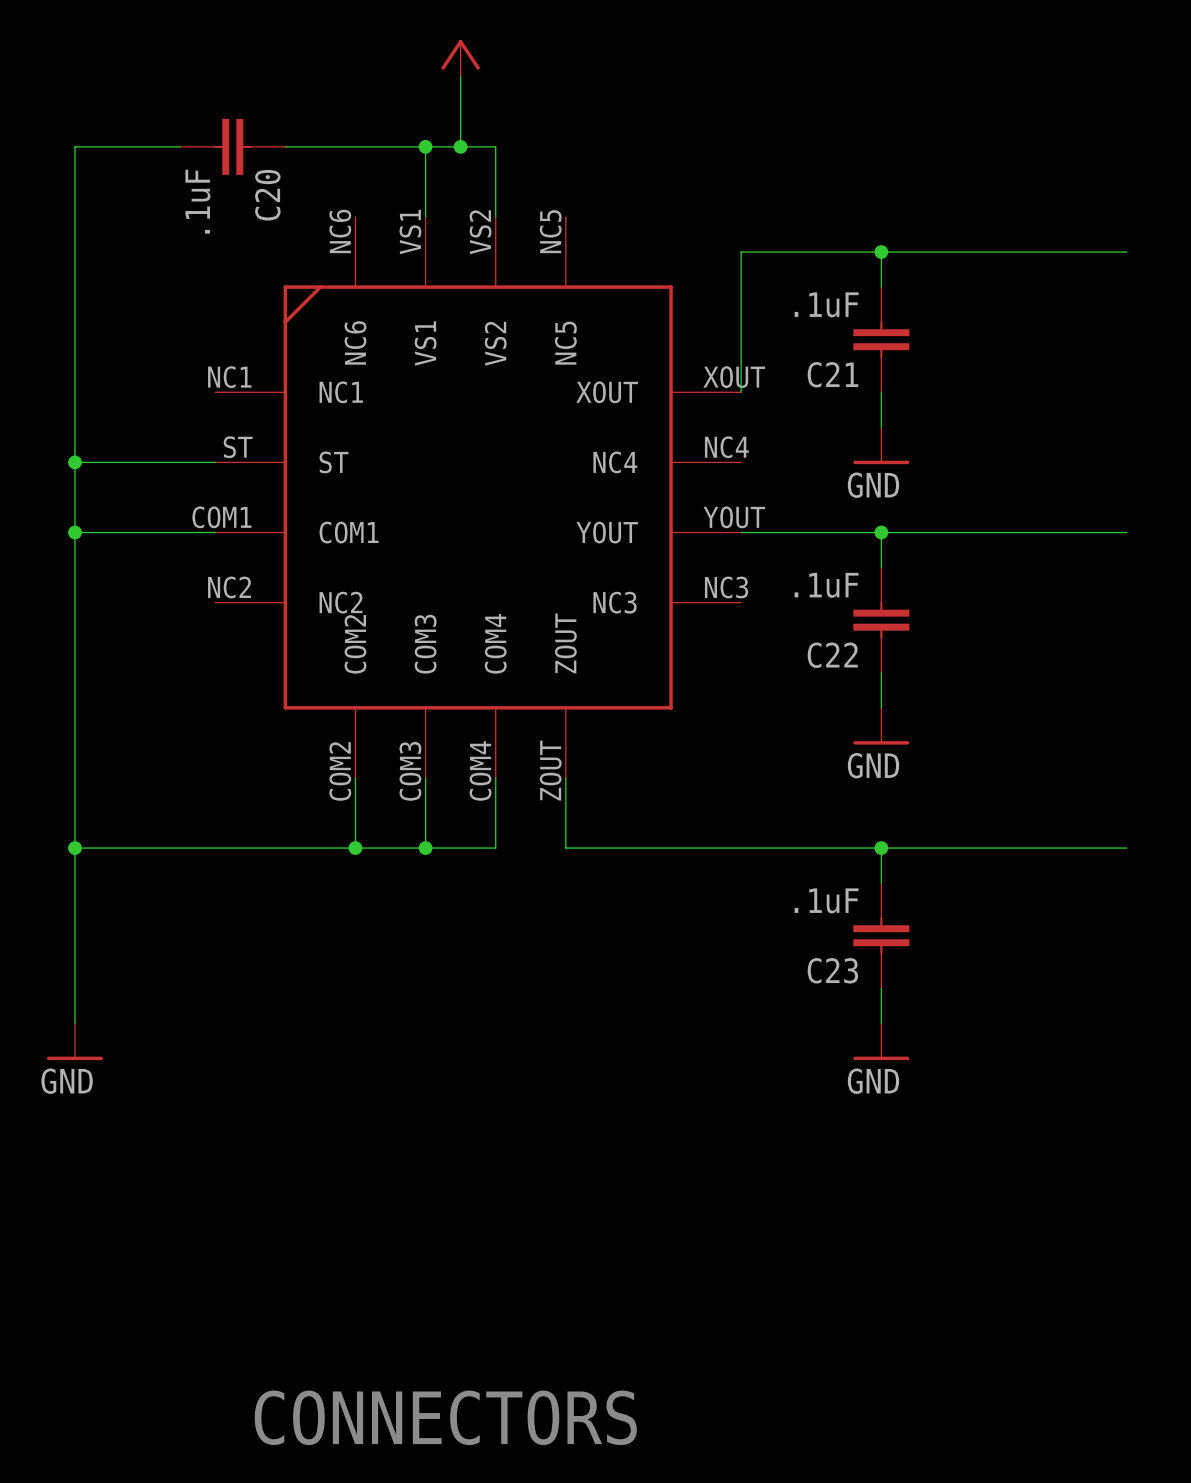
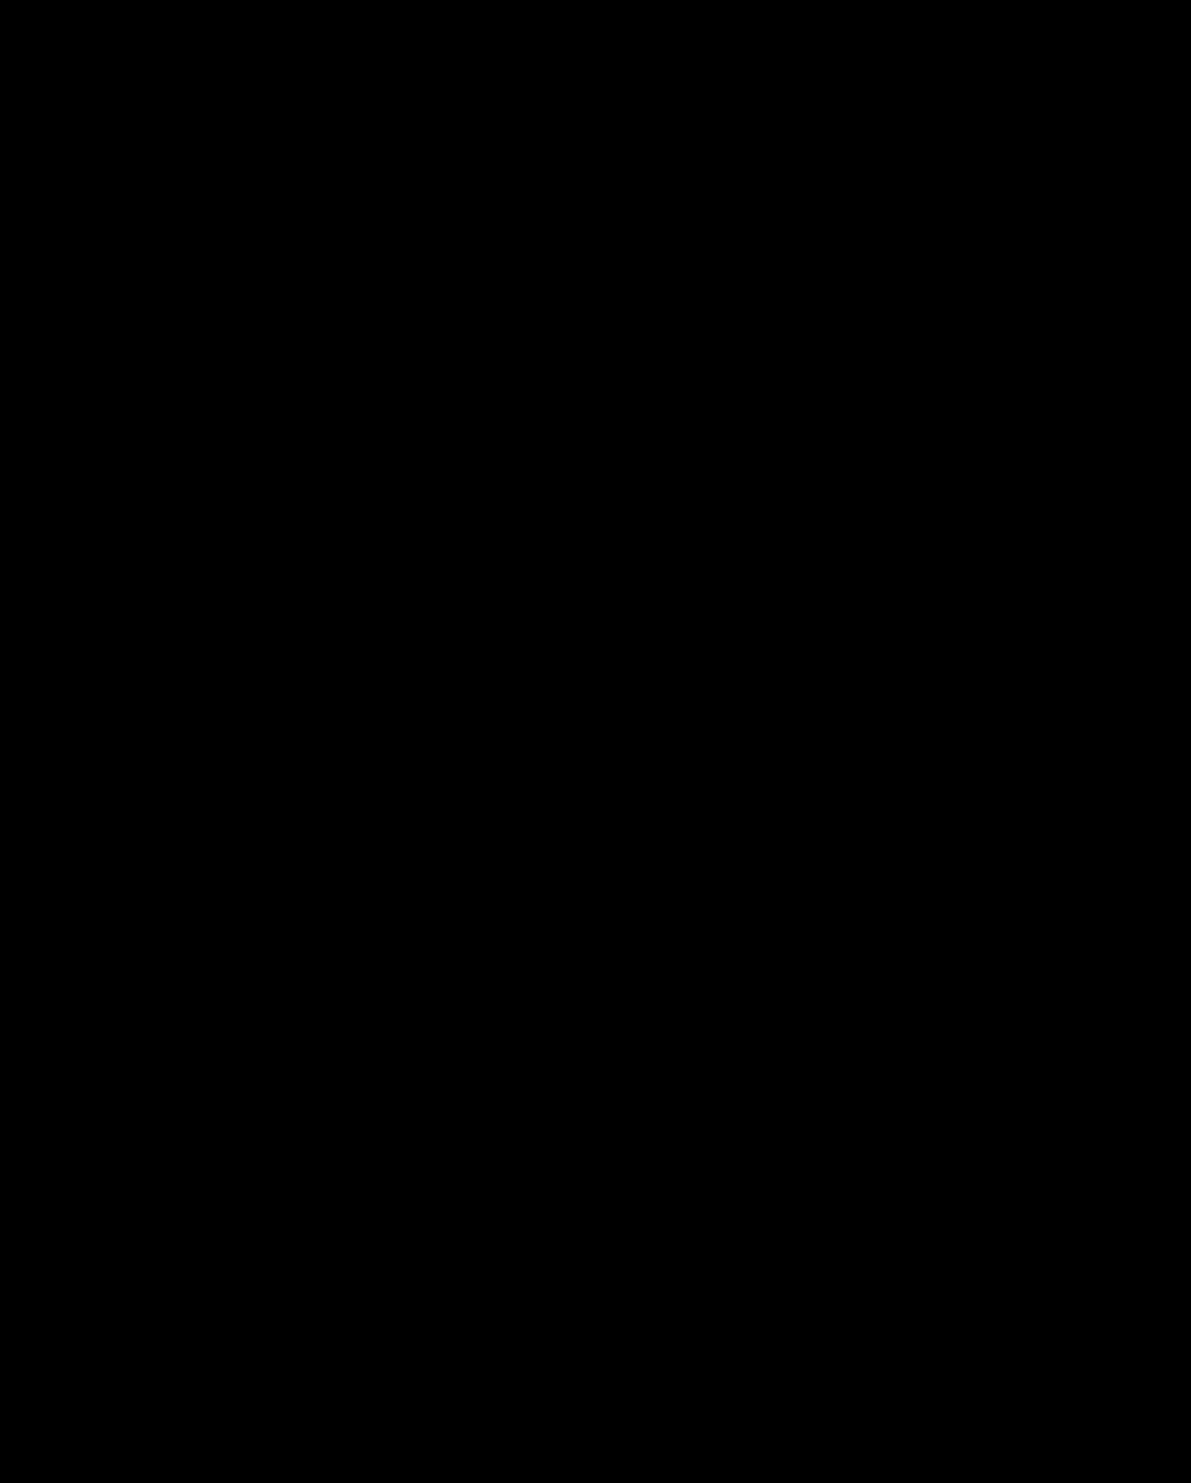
power symbol: (460, 58) -> none
wire: (460, 76) (460, 146) -> none
wire: (180, 146) (75, 146) (75, 1023) -> none
C20: .1uF (232, 146) -> none
wire: (285, 146) (495, 146) (495, 216) -> none
wire: (425, 146) (425, 216) -> none
junction: (425, 146) -> none
junction: (460, 146) -> none
wire: (881, 252) (881, 287) -> none
junction: (881, 252) -> none
wire: (1126, 252) (741, 252) (741, 392) -> none
C21: .1uF (881, 339) -> none
wire: (881, 392) (881, 427) -> none
power symbol: GND (881, 445) -> none
wire: (75, 462) (215, 462) -> none
junction: (75, 462) -> none
part: (478, 497) -> none
wire: (75, 532) (215, 532) -> none
junction: (75, 532) -> none
wire: (741, 532) (1126, 532) -> none
wire: (881, 532) (881, 567) -> none
junction: (881, 532) -> none
C22: .1uF (881, 620) -> none
wire: (881, 672) (881, 707) -> none
power symbol: GND (881, 726) -> none
wire: (355, 777) (355, 848) -> none
wire: (425, 777) (425, 848) -> none
wire: (495, 777) (495, 848) (75, 848) -> none
wire: (565, 777) (565, 848) (1126, 848) -> none
junction: (75, 848) -> none
junction: (355, 848) -> none
junction: (425, 848) -> none
wire: (881, 848) (881, 883) -> none
junction: (881, 848) -> none
C23: .1uF (881, 935) -> none
wire: (881, 988) (881, 1023) -> none
power symbol: GND (75, 1041) -> none
power symbol: GND (881, 1041) -> none
text: CONNECTORS (445, 1417) -> none

